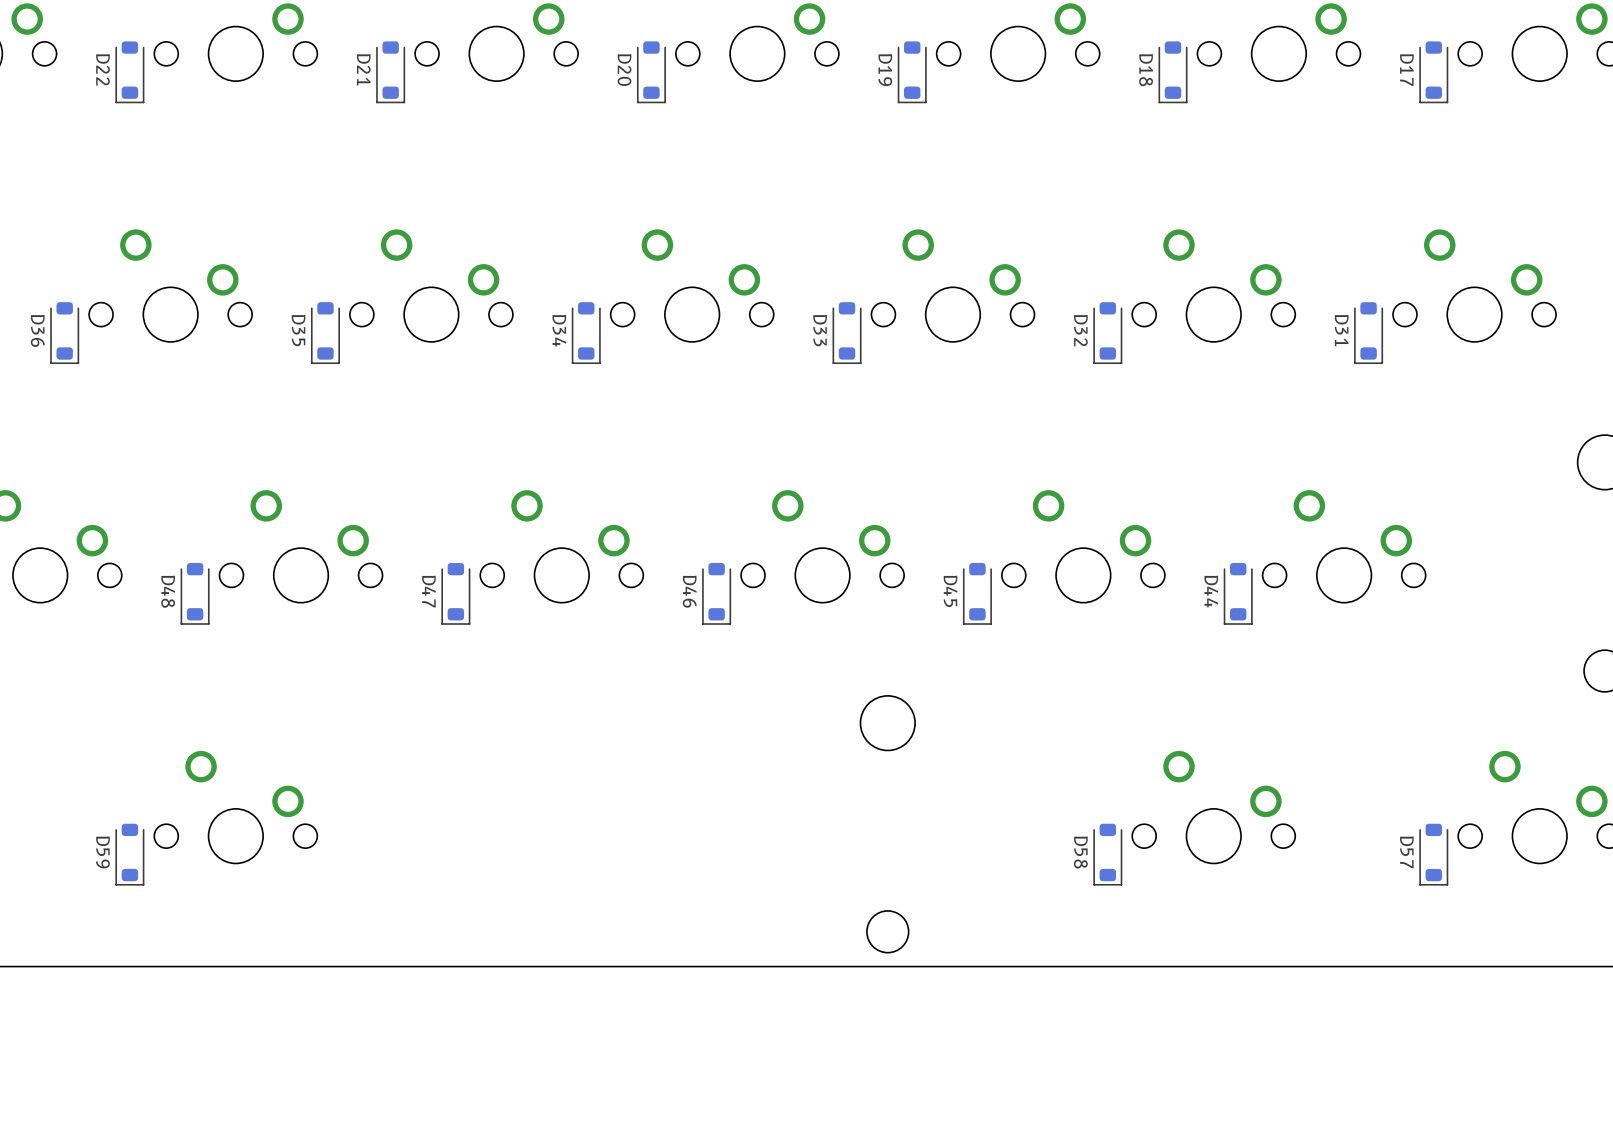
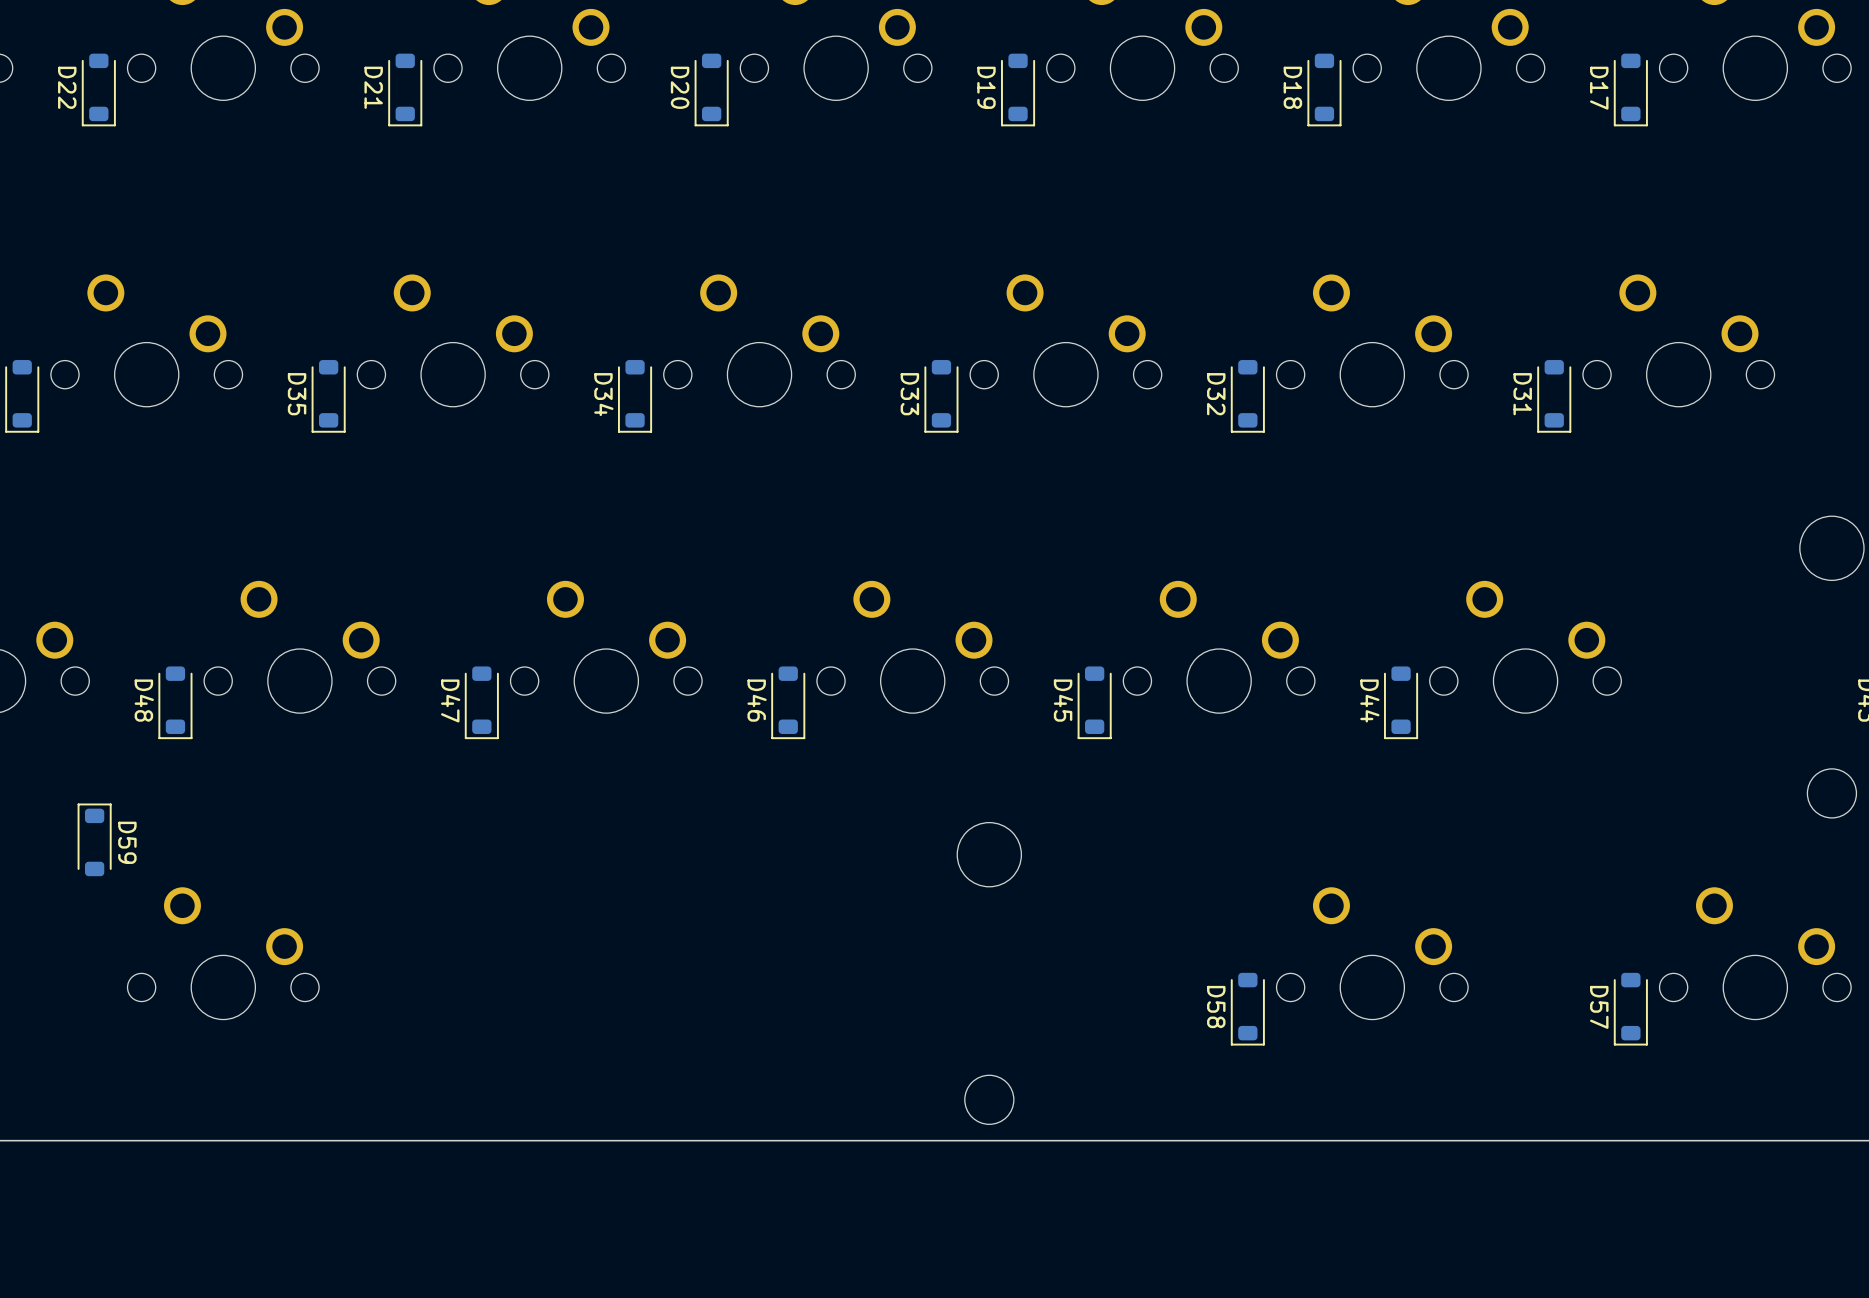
D59 rotation: 0° (129, 854) -> 180° (94, 839)
D59 position: (129, 854) -> (94, 839)

